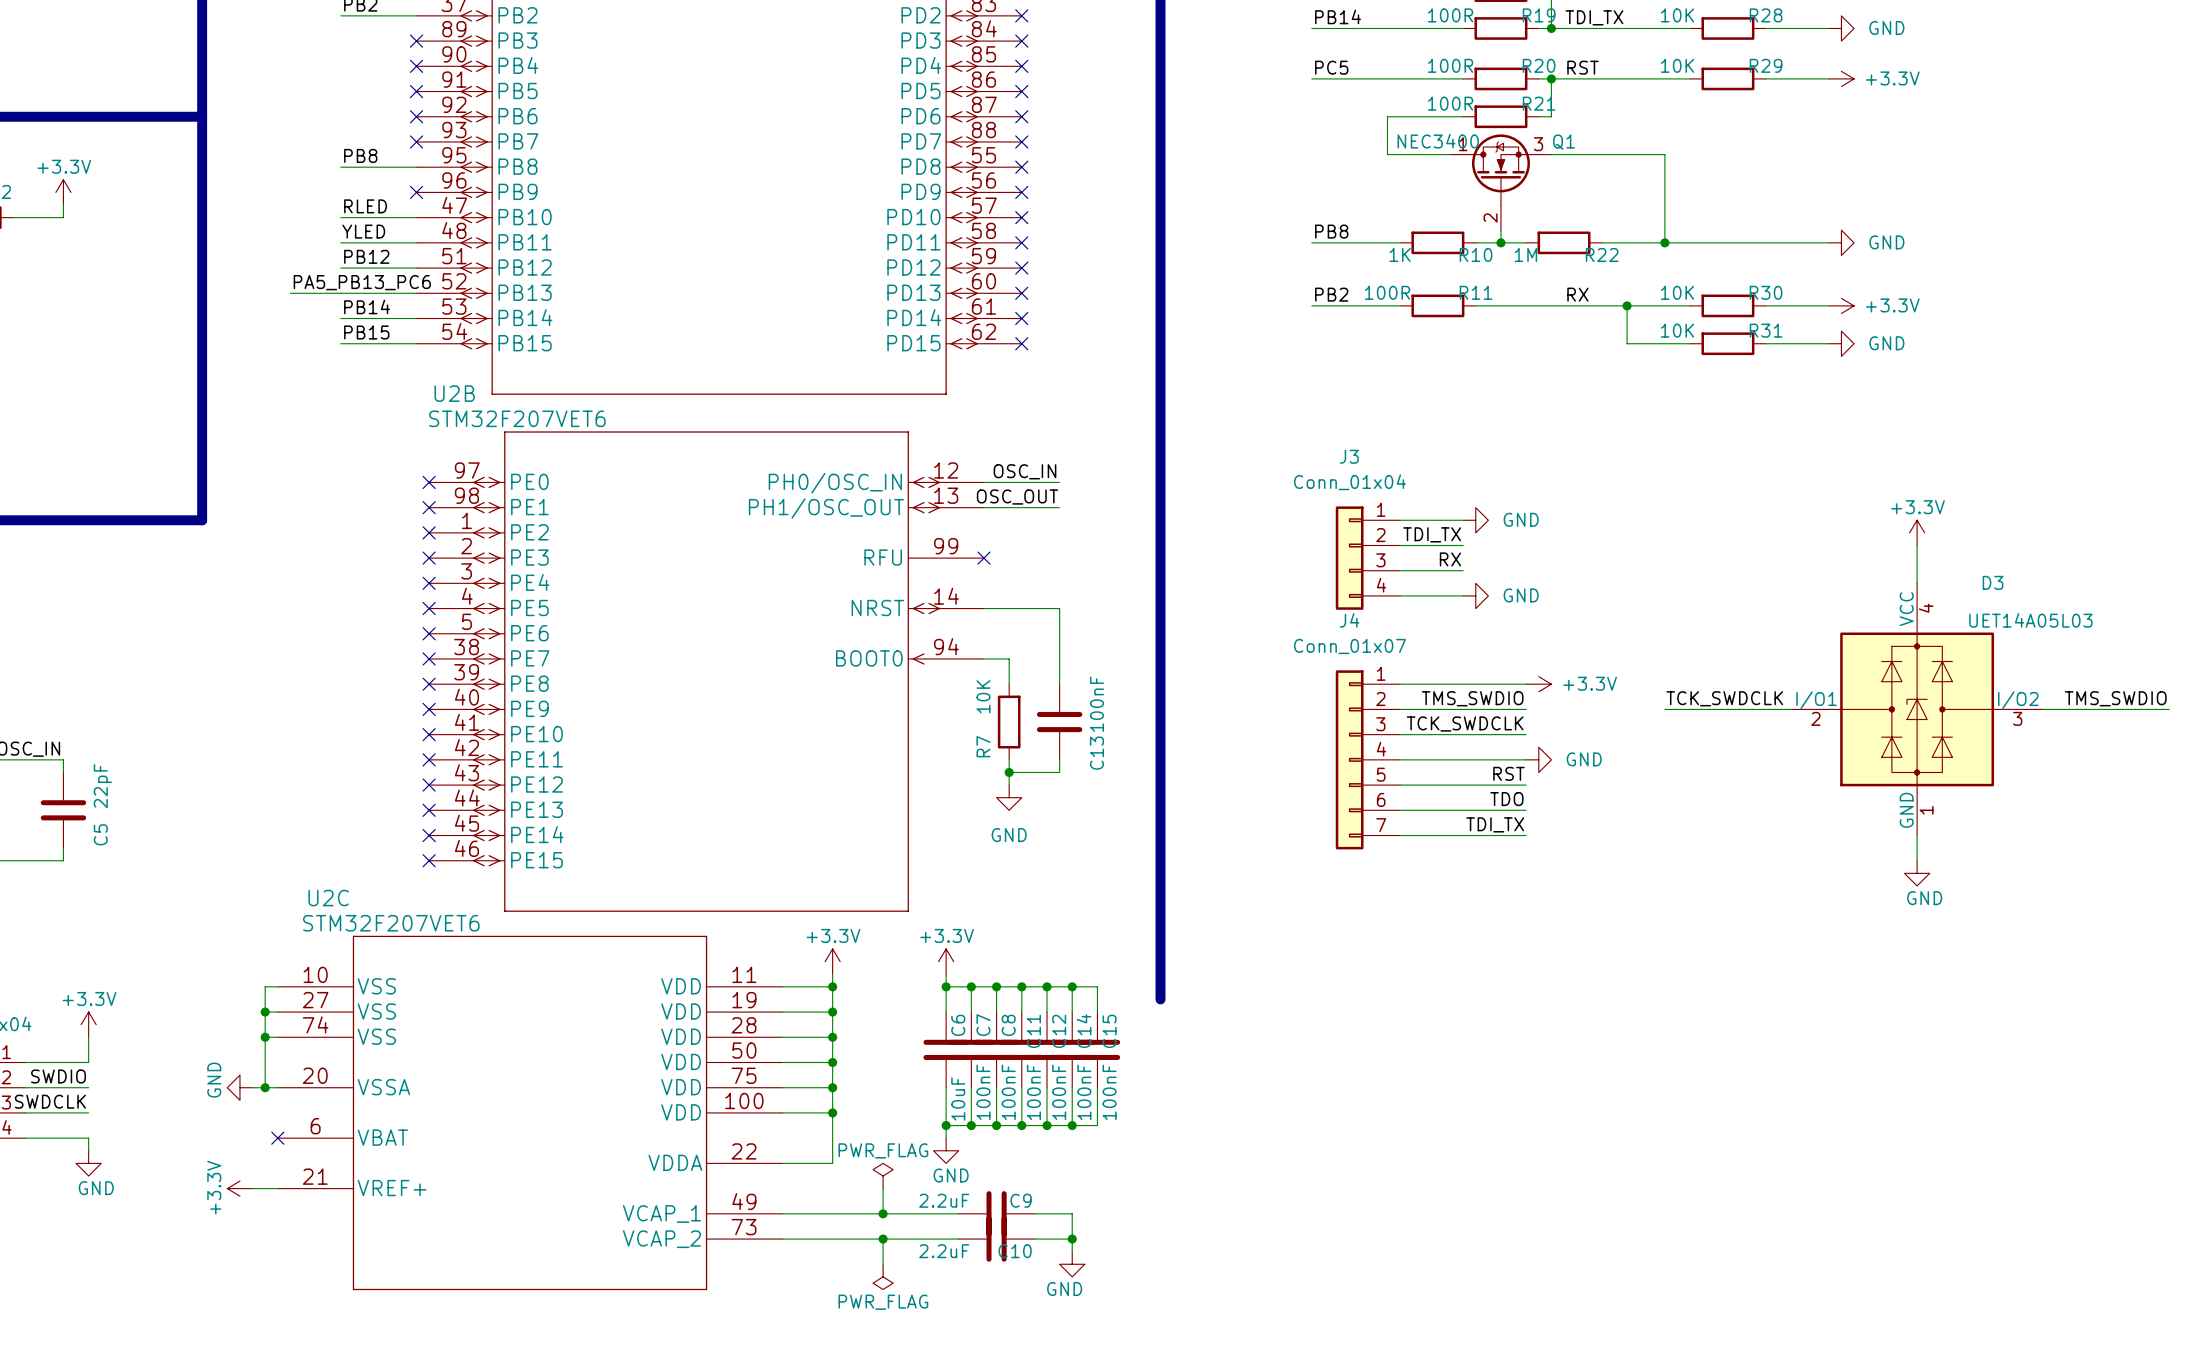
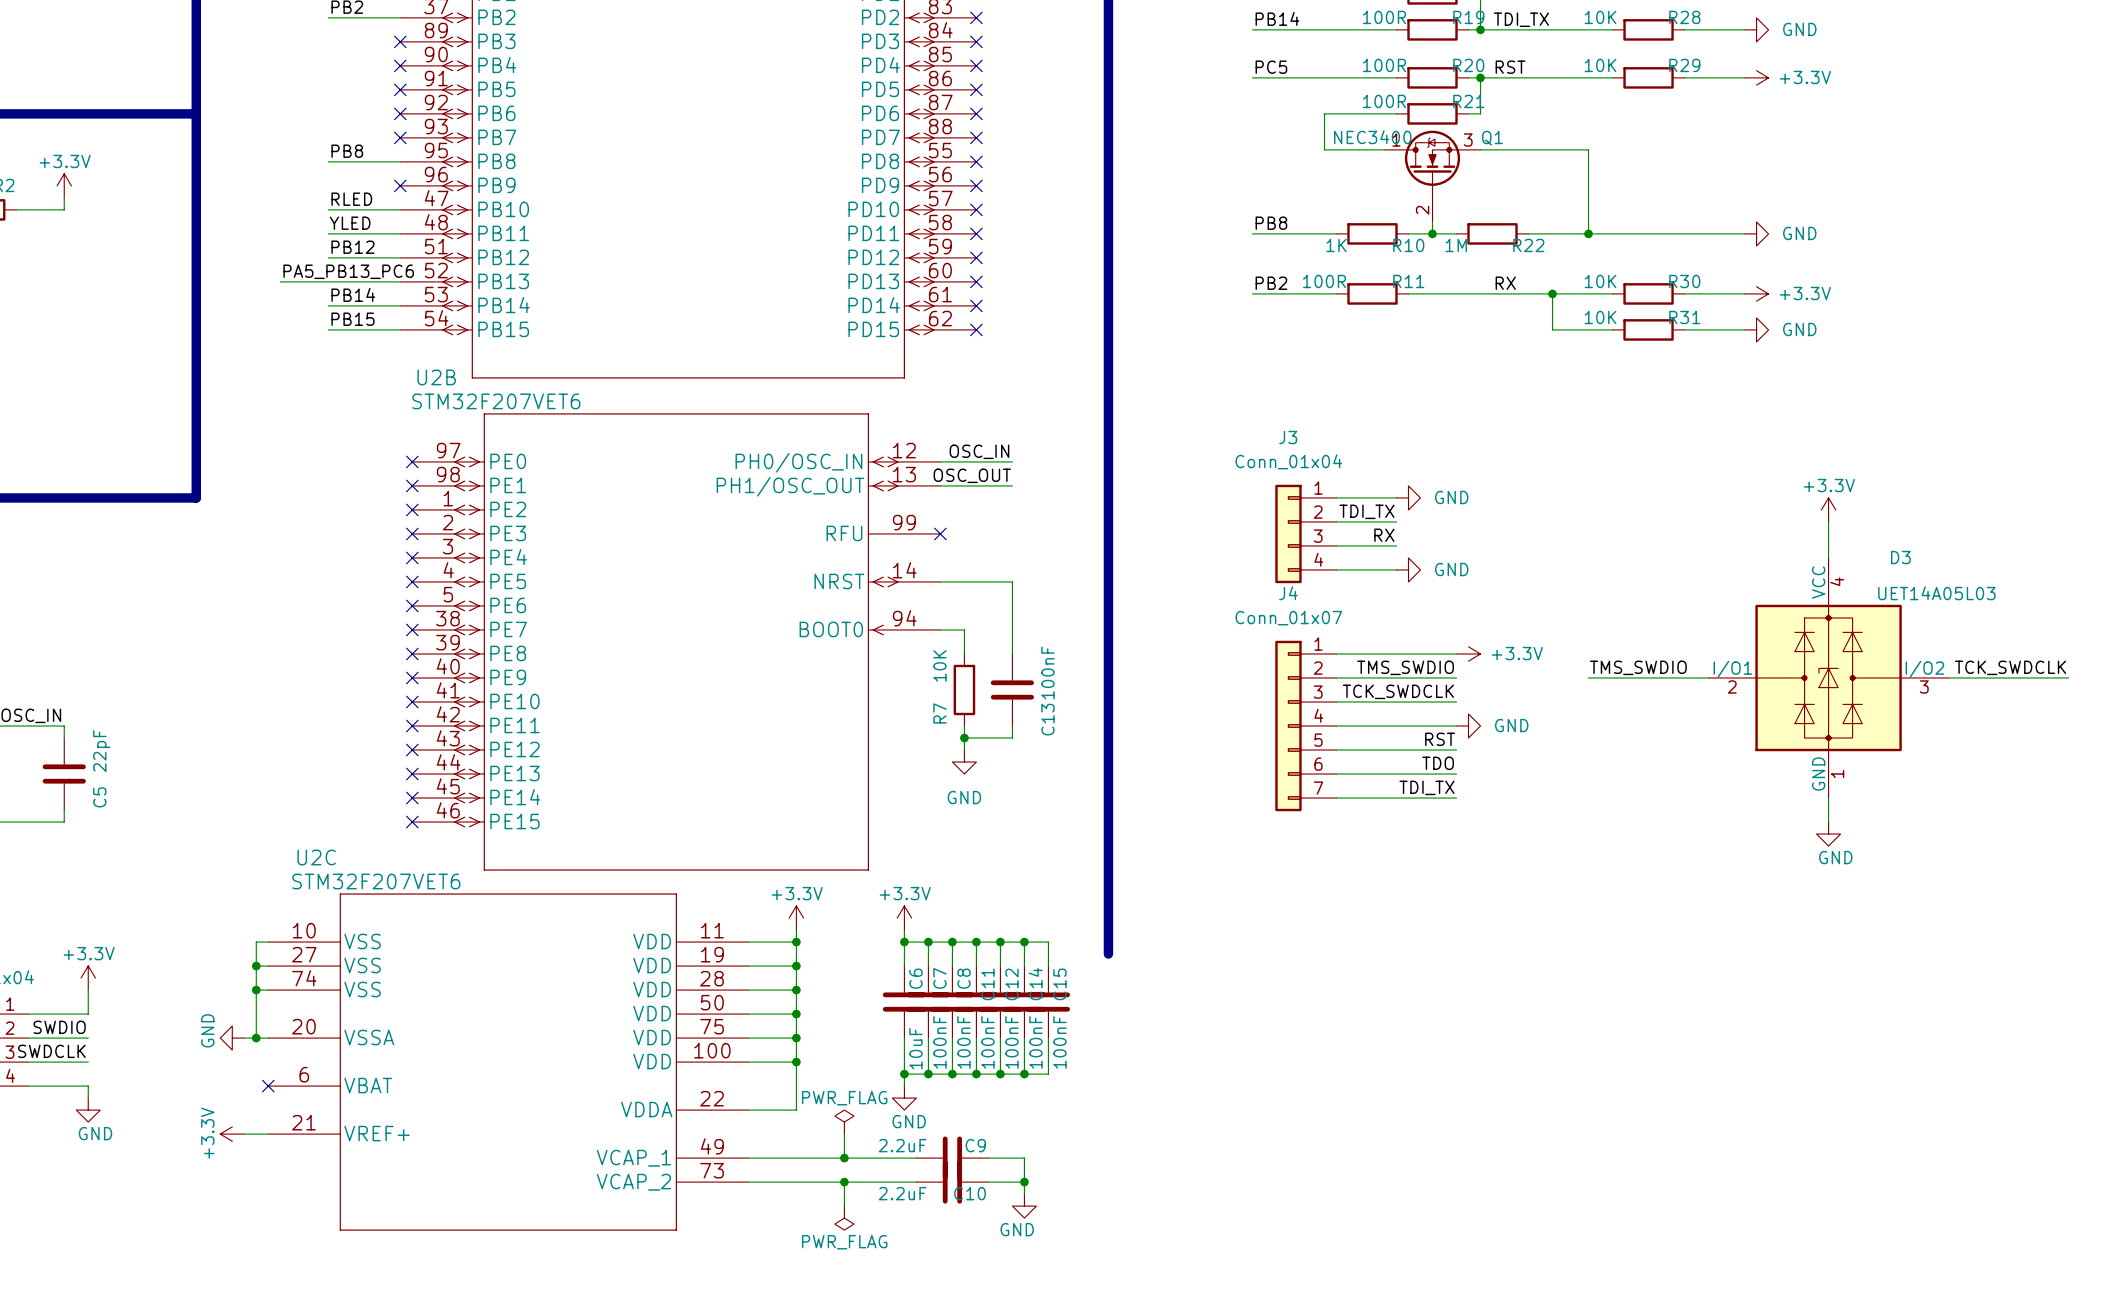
label: TCK_SWDCLK (1724, 698) -> TMS_SWDIO (1638, 667)
label: TMS_SWDIO (2115, 698) -> TCK_SWDCLK (2010, 667)

